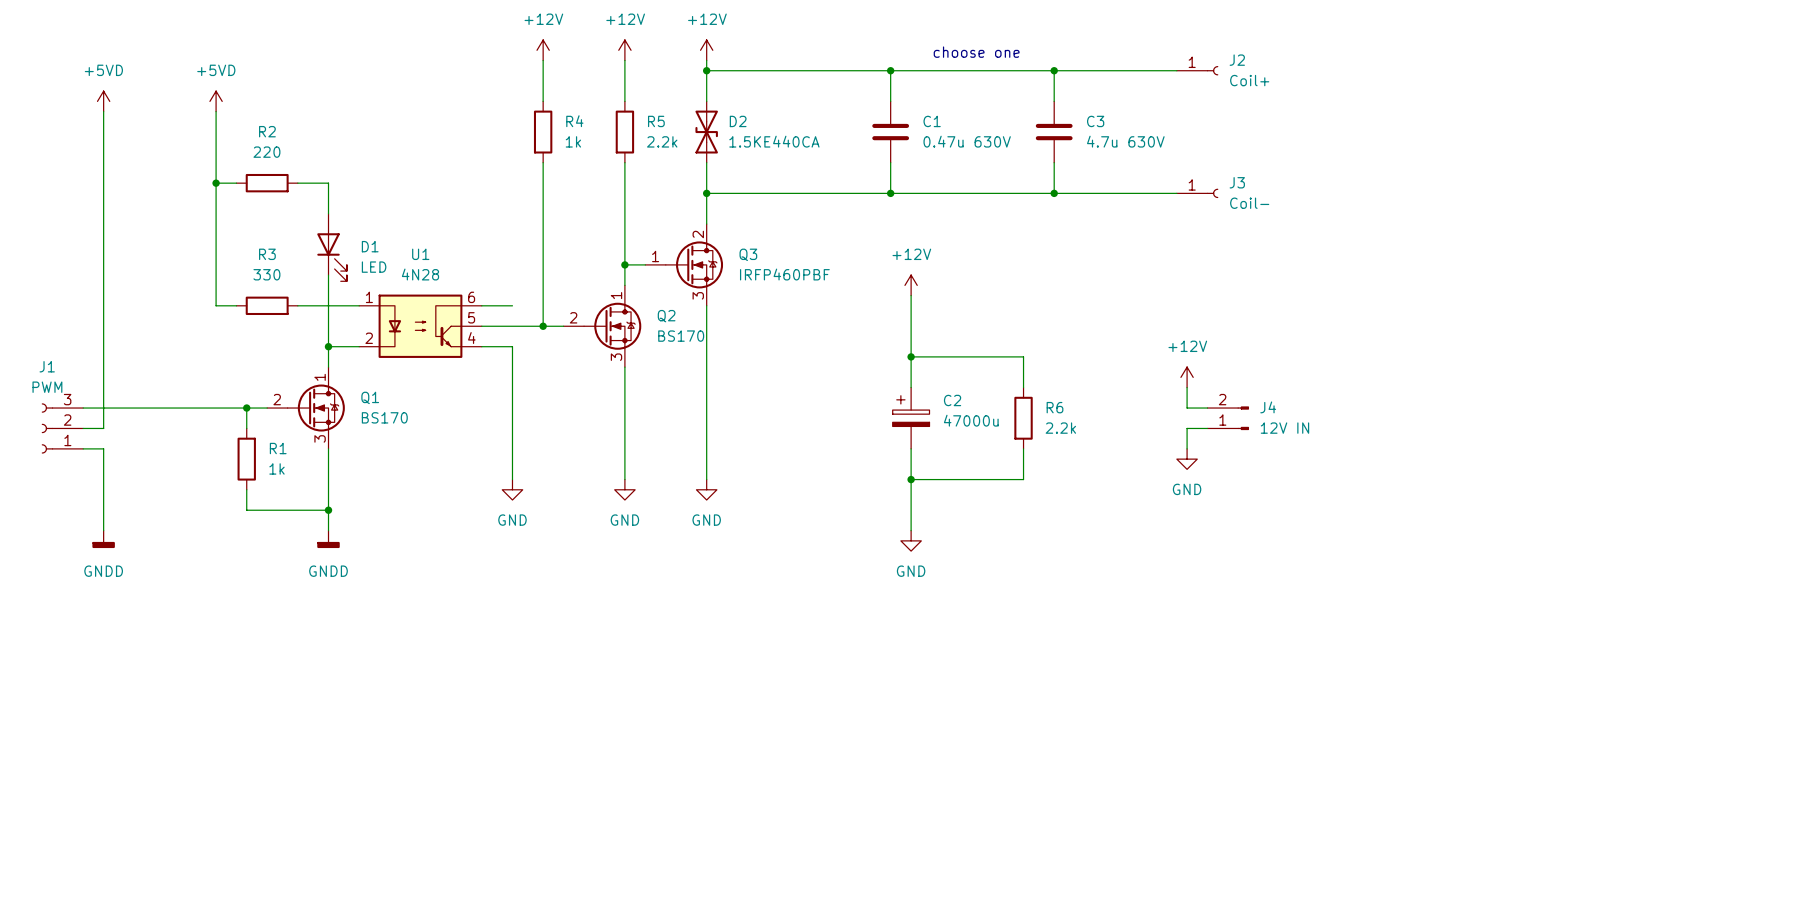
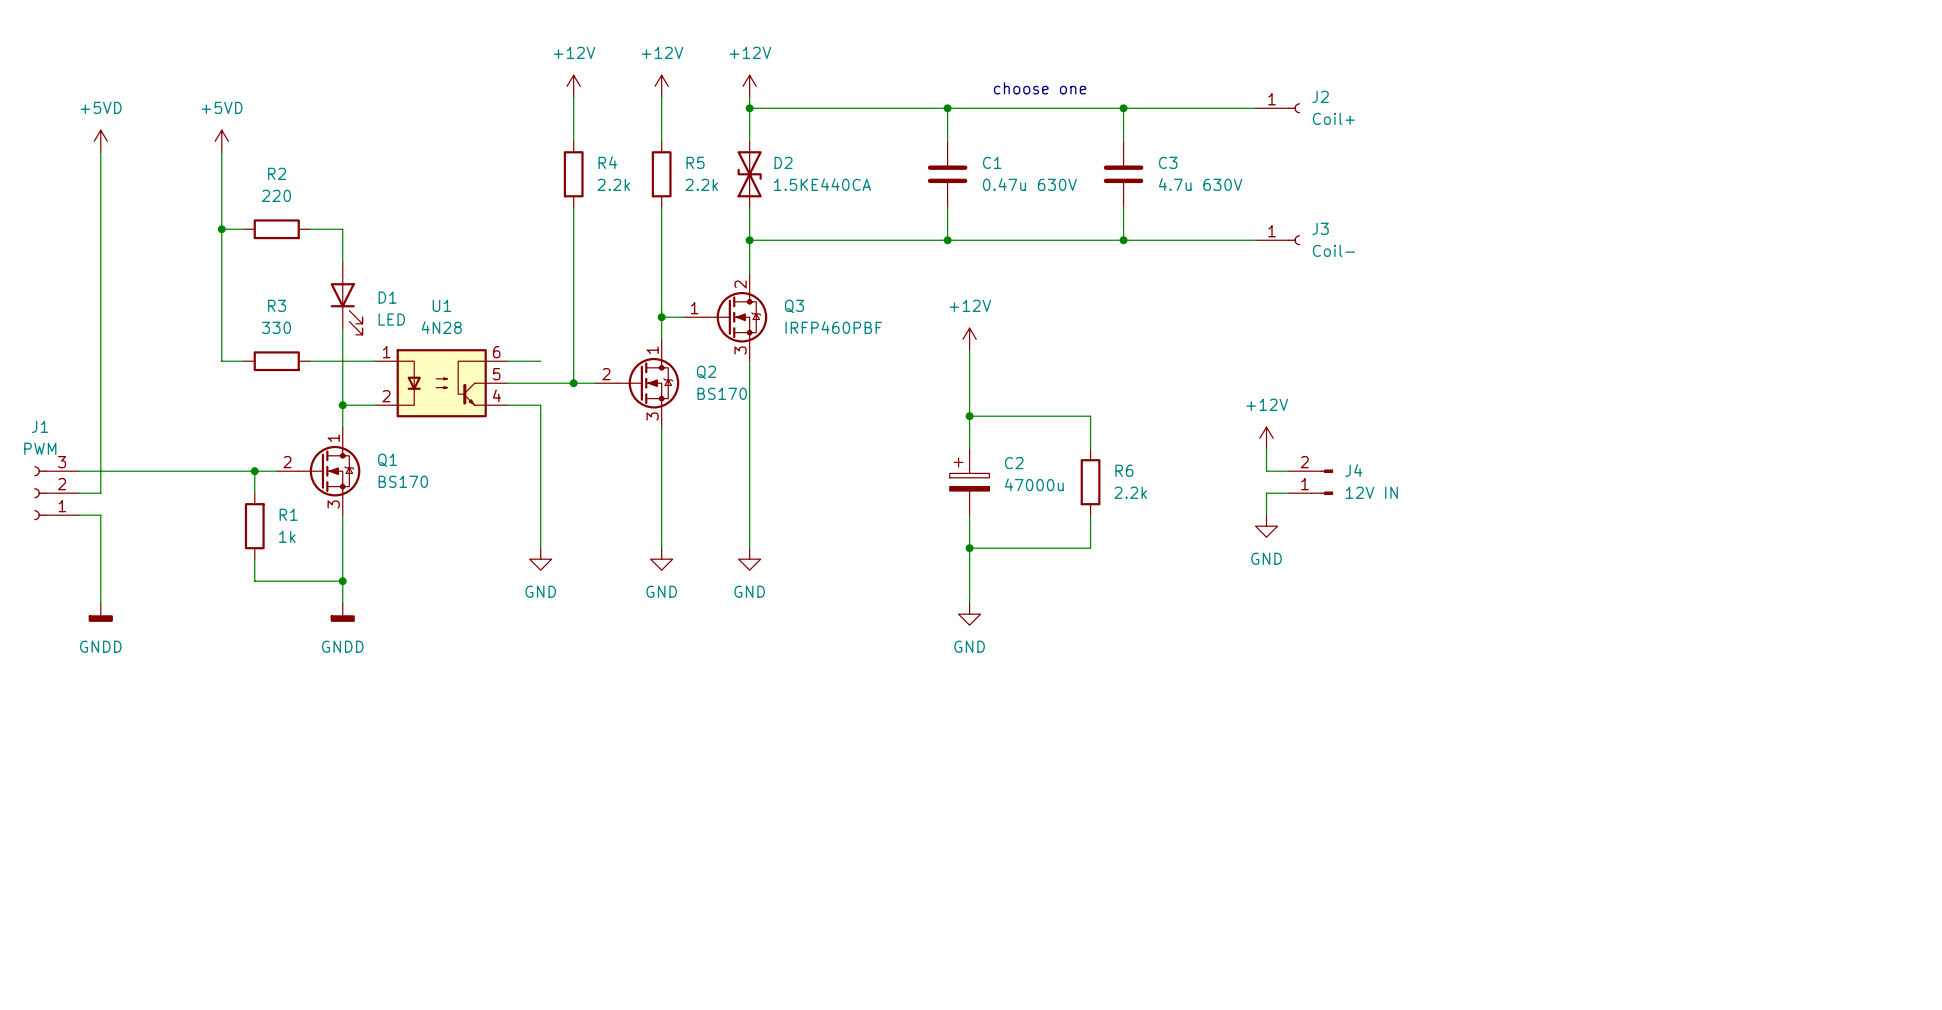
R4 value: 1k (573, 141) -> 2.2k (613, 184)

